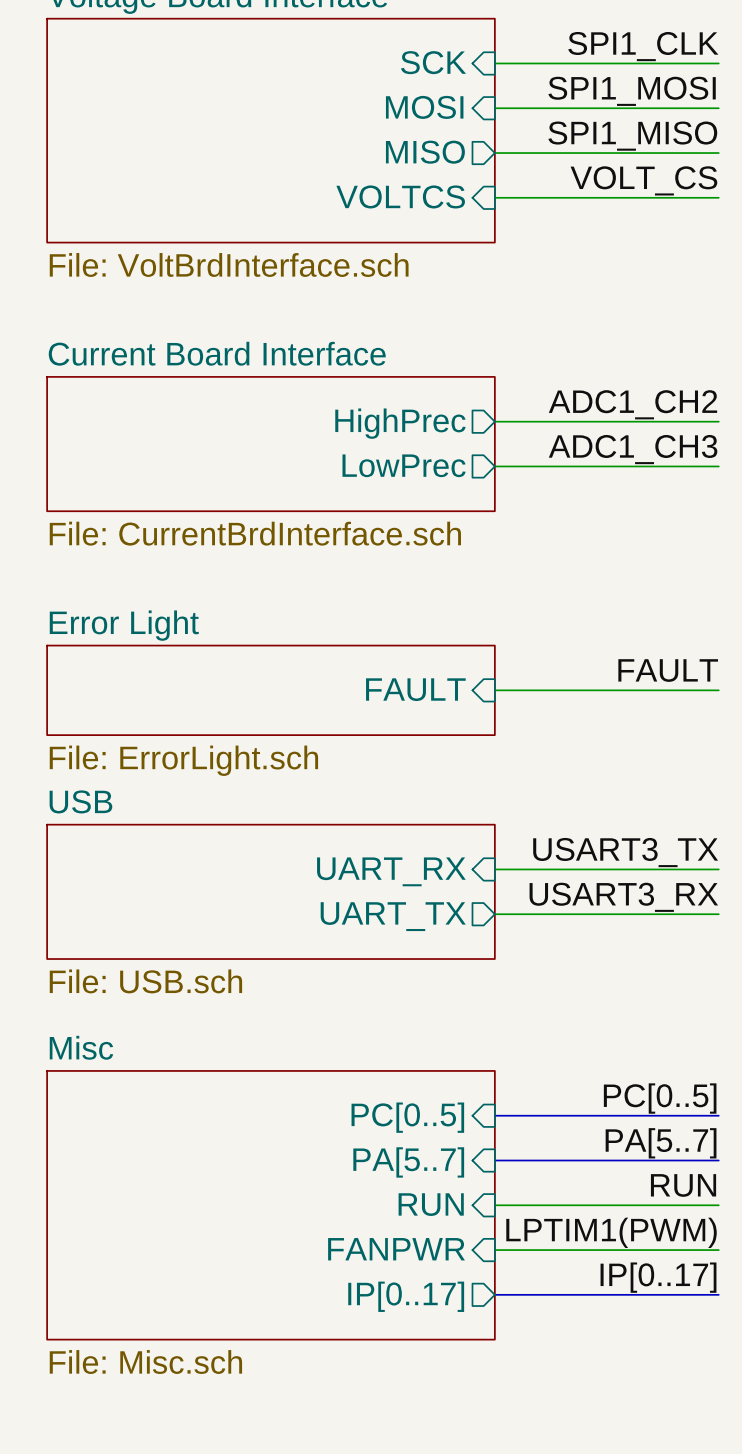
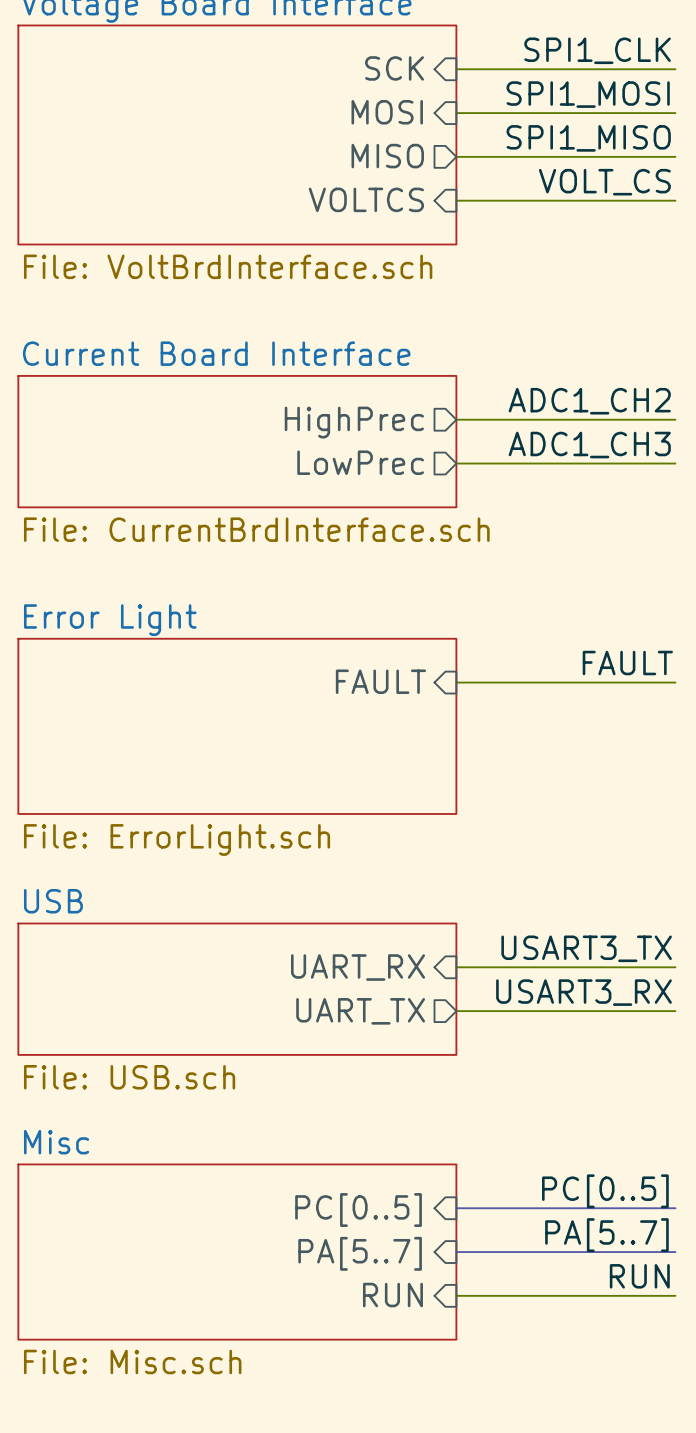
sheet Error Light: File: ErrorLight.sch (270, 690) -> none
sheet Error Light: none -> File: ErrorLight.sch (237, 726)
label position: USART3_TX (625, 852) -> USART3_TX (586, 948)
wire: (494, 869) (718, 869) -> (456, 967) (675, 967)
sheet pin position: UART_RX (391, 871) -> UART_RX (358, 967)
sheet USB position: (270, 891) -> (237, 989)
label position: USART3_RX (623, 897) -> USART3_RX (584, 992)
wire: (494, 914) (718, 914) -> (456, 1011) (675, 1011)
sheet pin position: UART_TX (393, 916) -> UART_TX (360, 1011)
label position: PC[0..5] (660, 1098) -> PC[0..5] (605, 1191)
bus: (494, 1115) (718, 1115) -> (456, 1208) (675, 1208)
sheet pin position: PC[0..5] (407, 1117) -> PC[0..5] (358, 1210)
label position: PA[5..7] (661, 1143) -> PA[5..7] (606, 1235)
bus: (494, 1160) (718, 1160) -> (456, 1252) (675, 1252)
sheet pin position: PA[5..7] (408, 1162) -> PA[5..7] (360, 1253)
label position: RUN (683, 1185) -> RUN (639, 1276)
sheet pin position: RUN (431, 1204) -> RUN (392, 1295)
sheet Misc: File: Misc.sch (270, 1205) -> none
wire: (494, 1205) (718, 1205) -> (456, 1295) (675, 1295)
label: LPTIM1(PWM) (611, 1232) -> none
sheet pin: FANPWR (396, 1249) -> none
wire: (494, 1250) (718, 1250) -> none
sheet Misc: none -> File: Misc.sch (237, 1252)
label: IP[0..17] (658, 1277) -> none
bus: (494, 1294) (718, 1294) -> none
sheet pin: IP[0..17] (406, 1296) -> none

